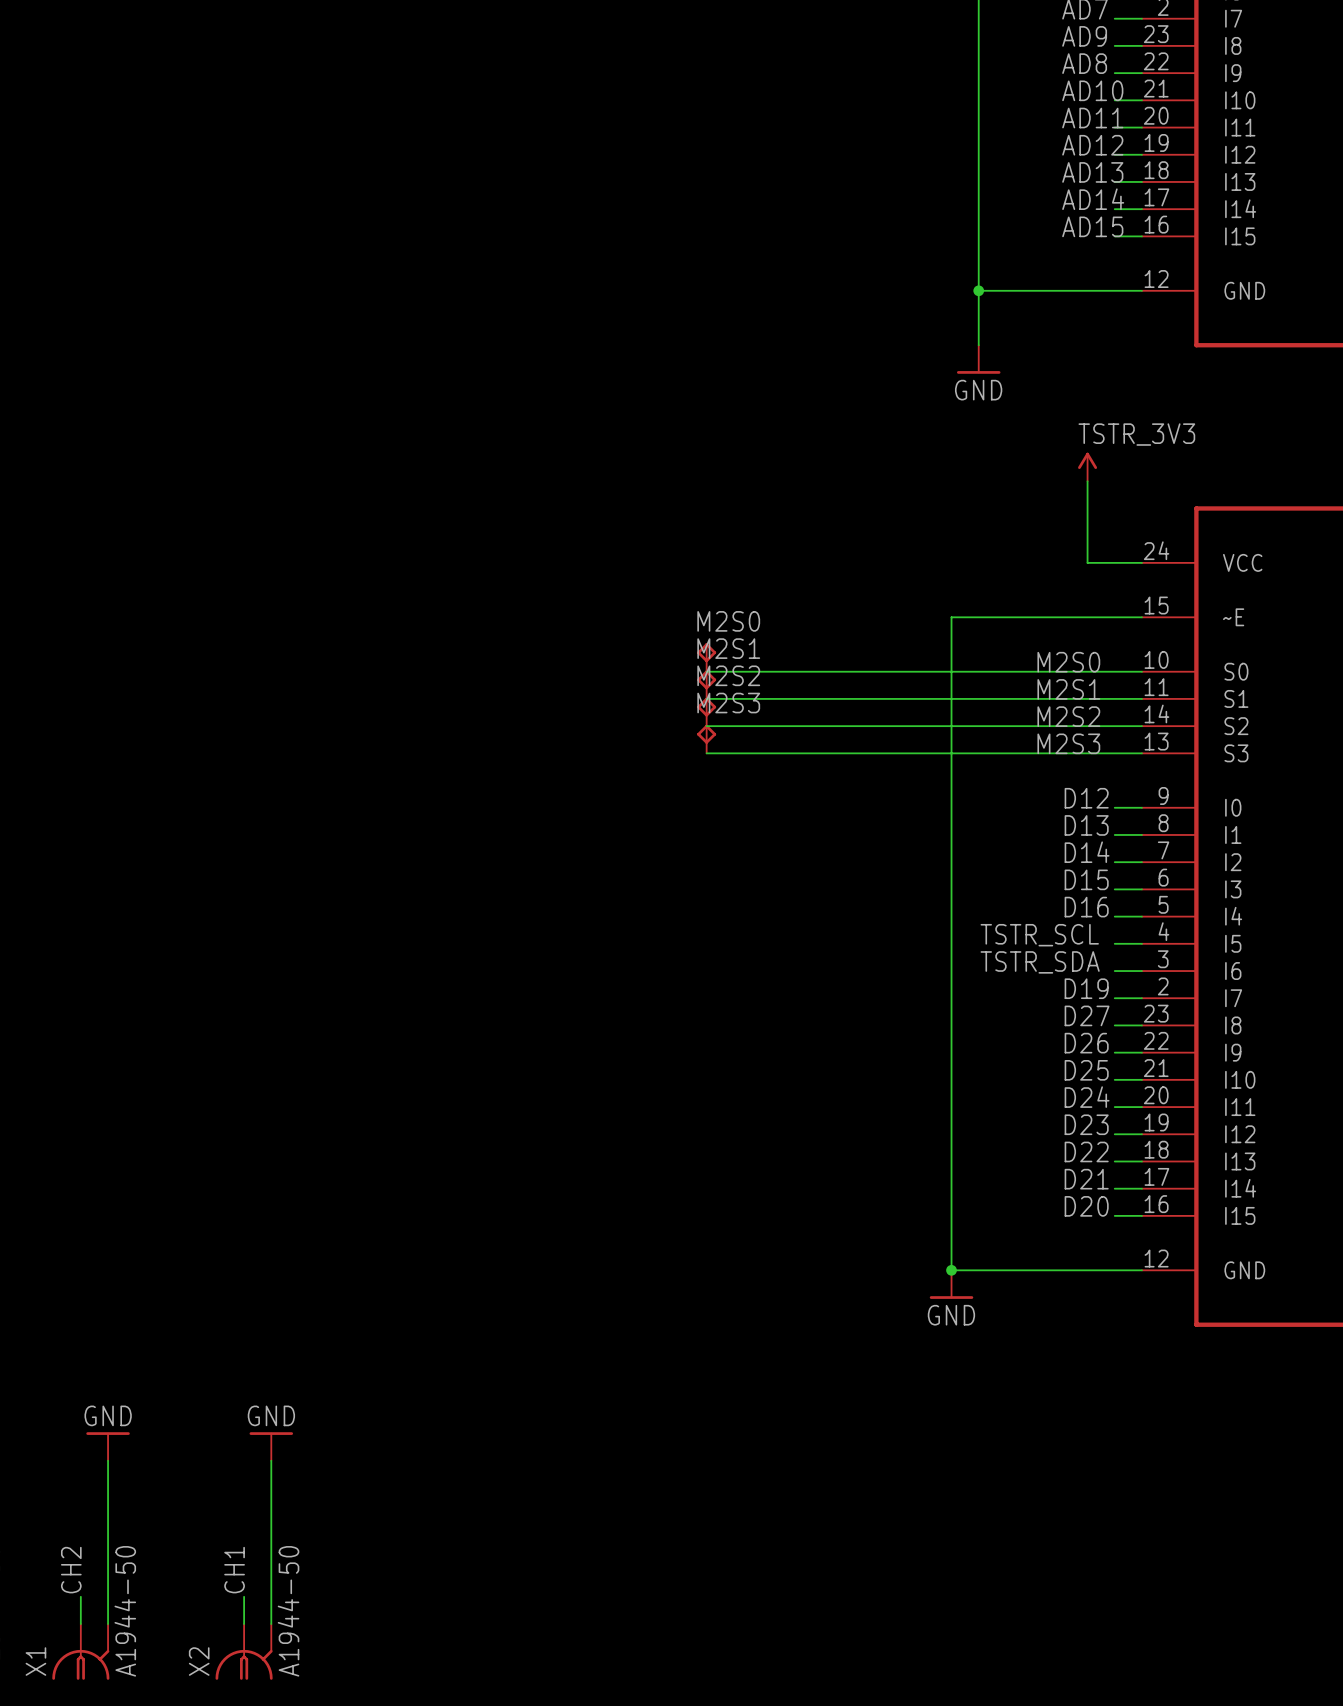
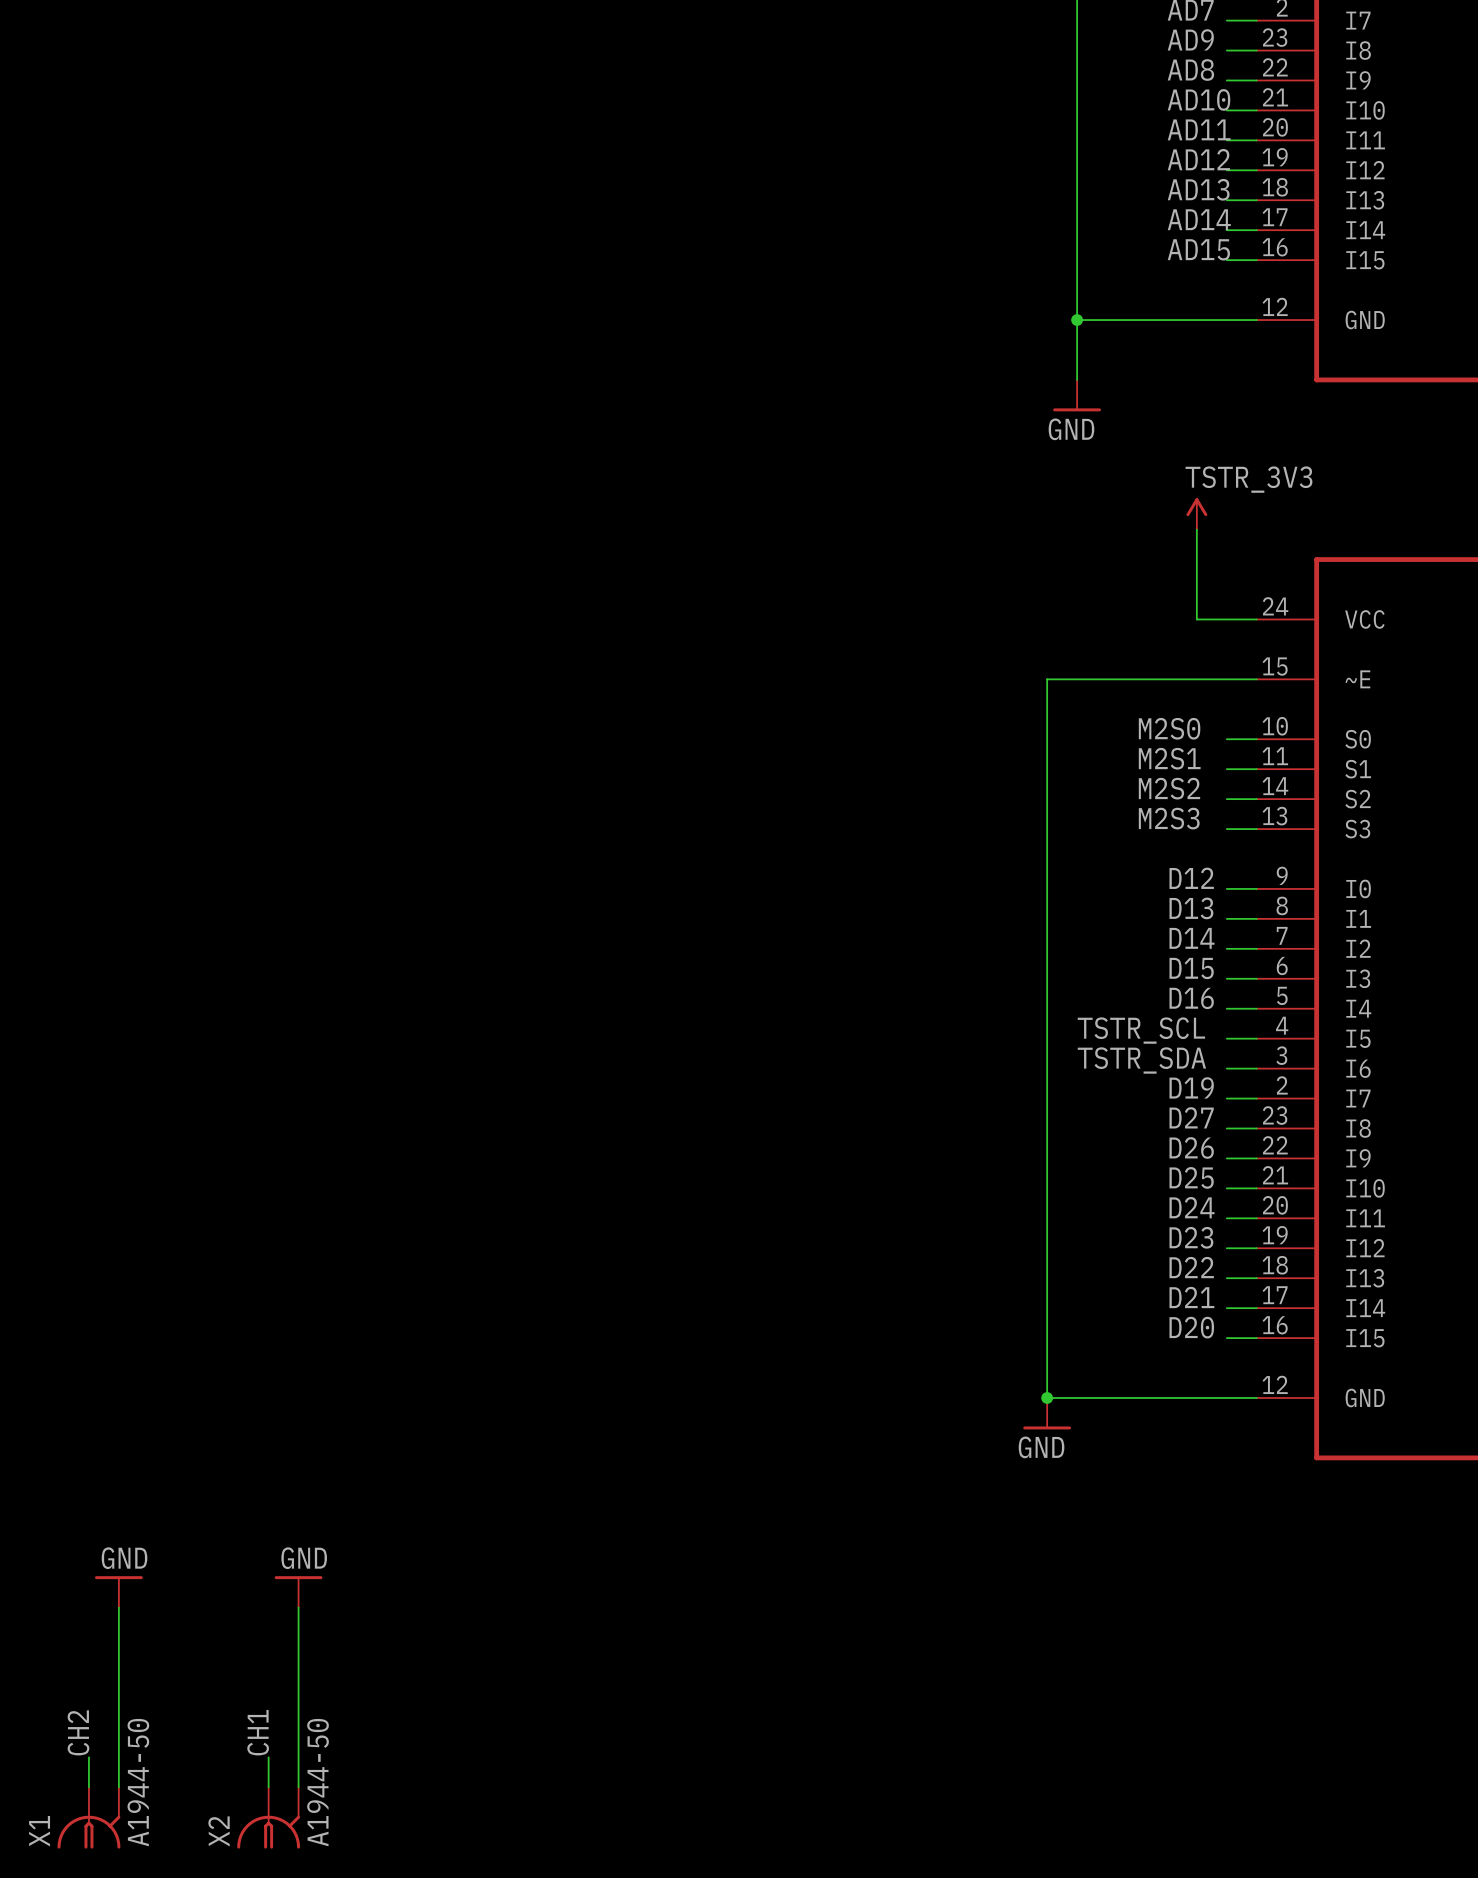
M2S0: (706, 657) -> none
wire: (706, 671) (1114, 671) -> none
M2S1: (706, 684) -> none
wire: (706, 698) (1114, 698) -> none
M2S2: (706, 711) -> none
wire: (706, 726) (1114, 726) -> none
M2S3: (706, 739) -> none
wire: (706, 753) (1114, 753) -> none

